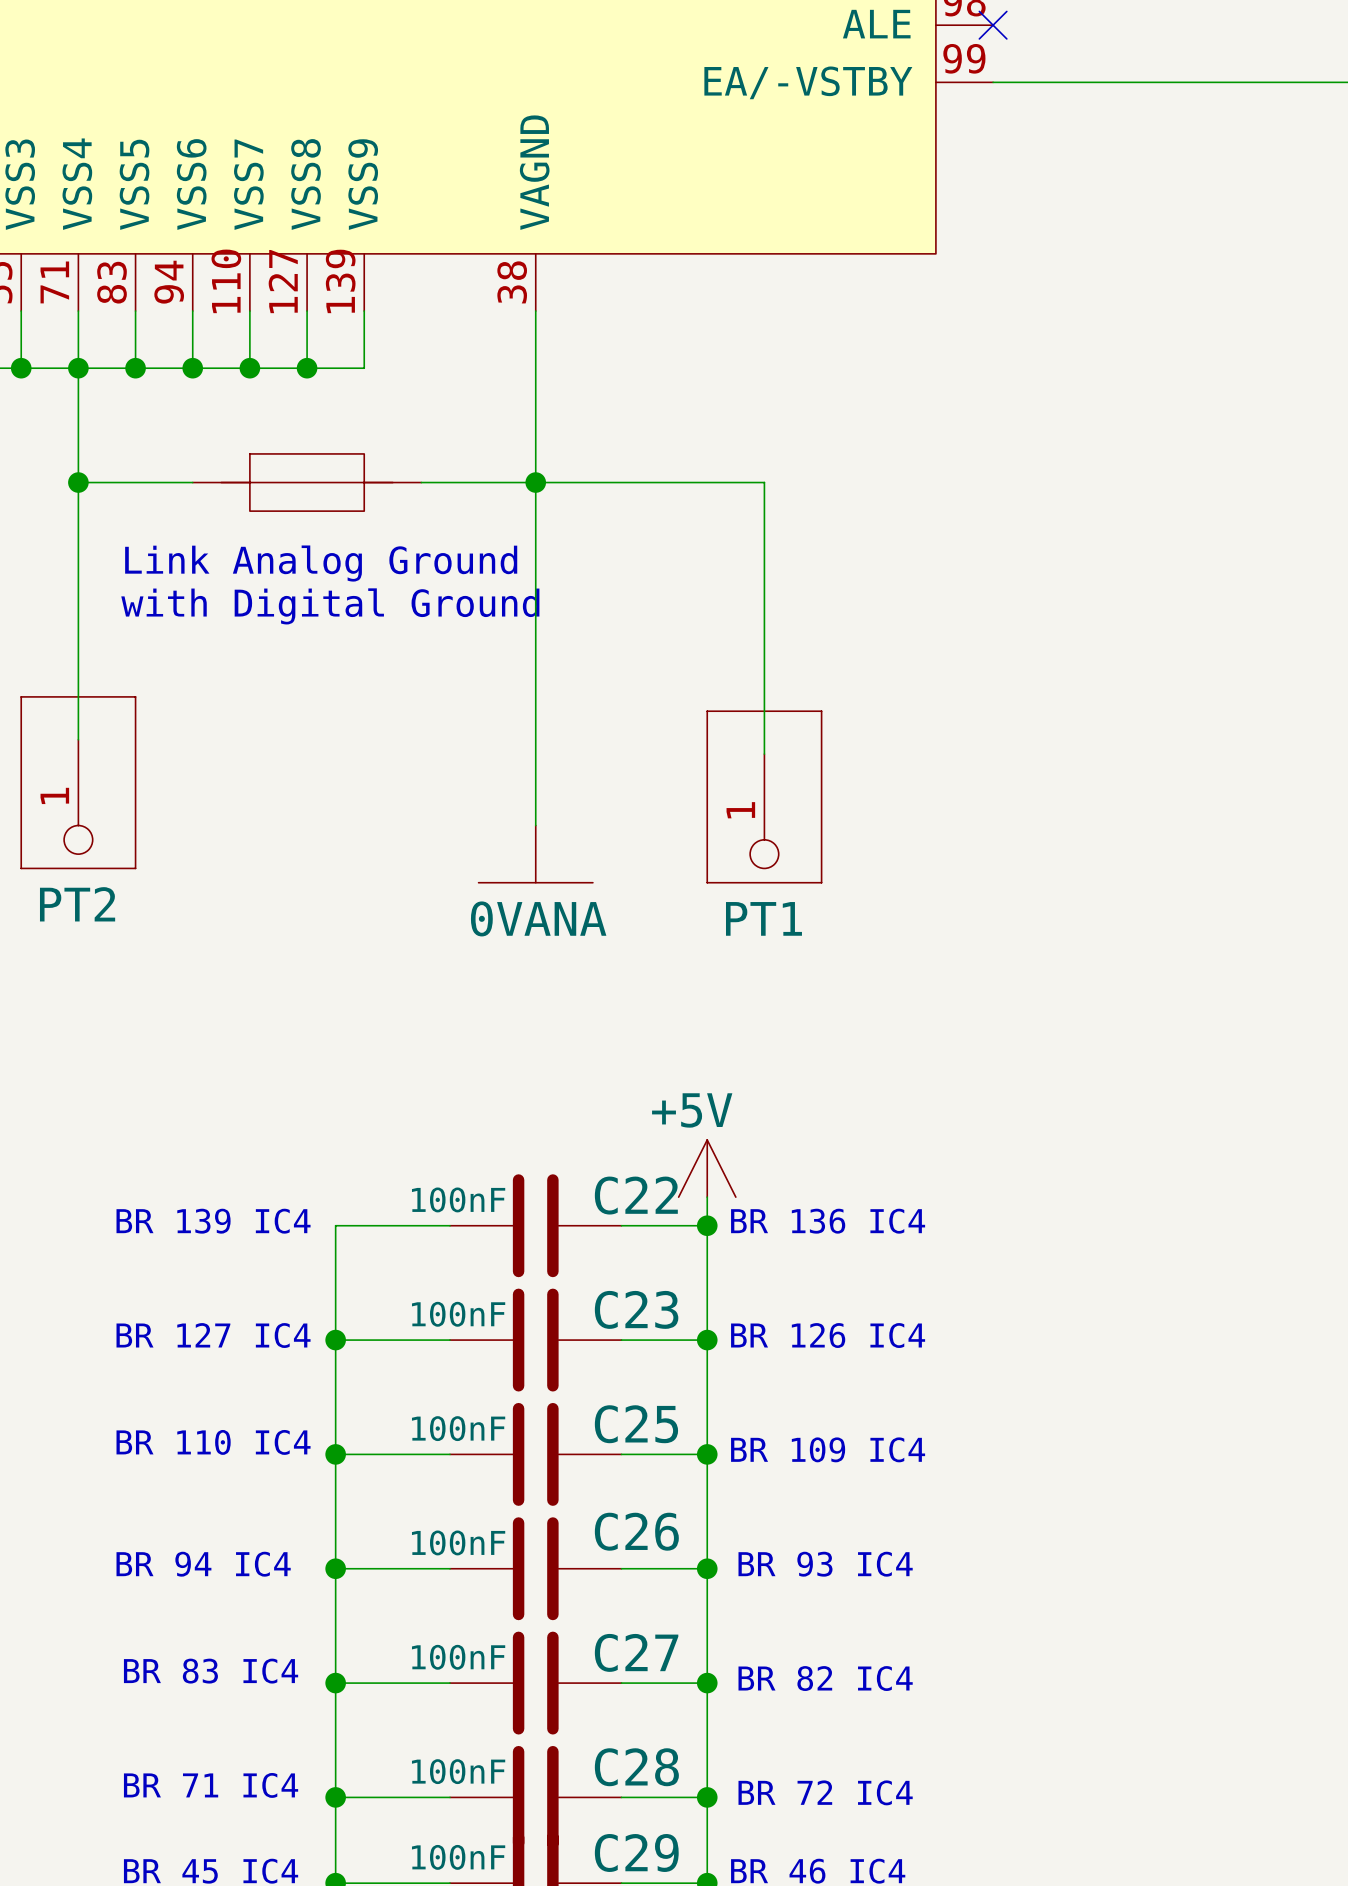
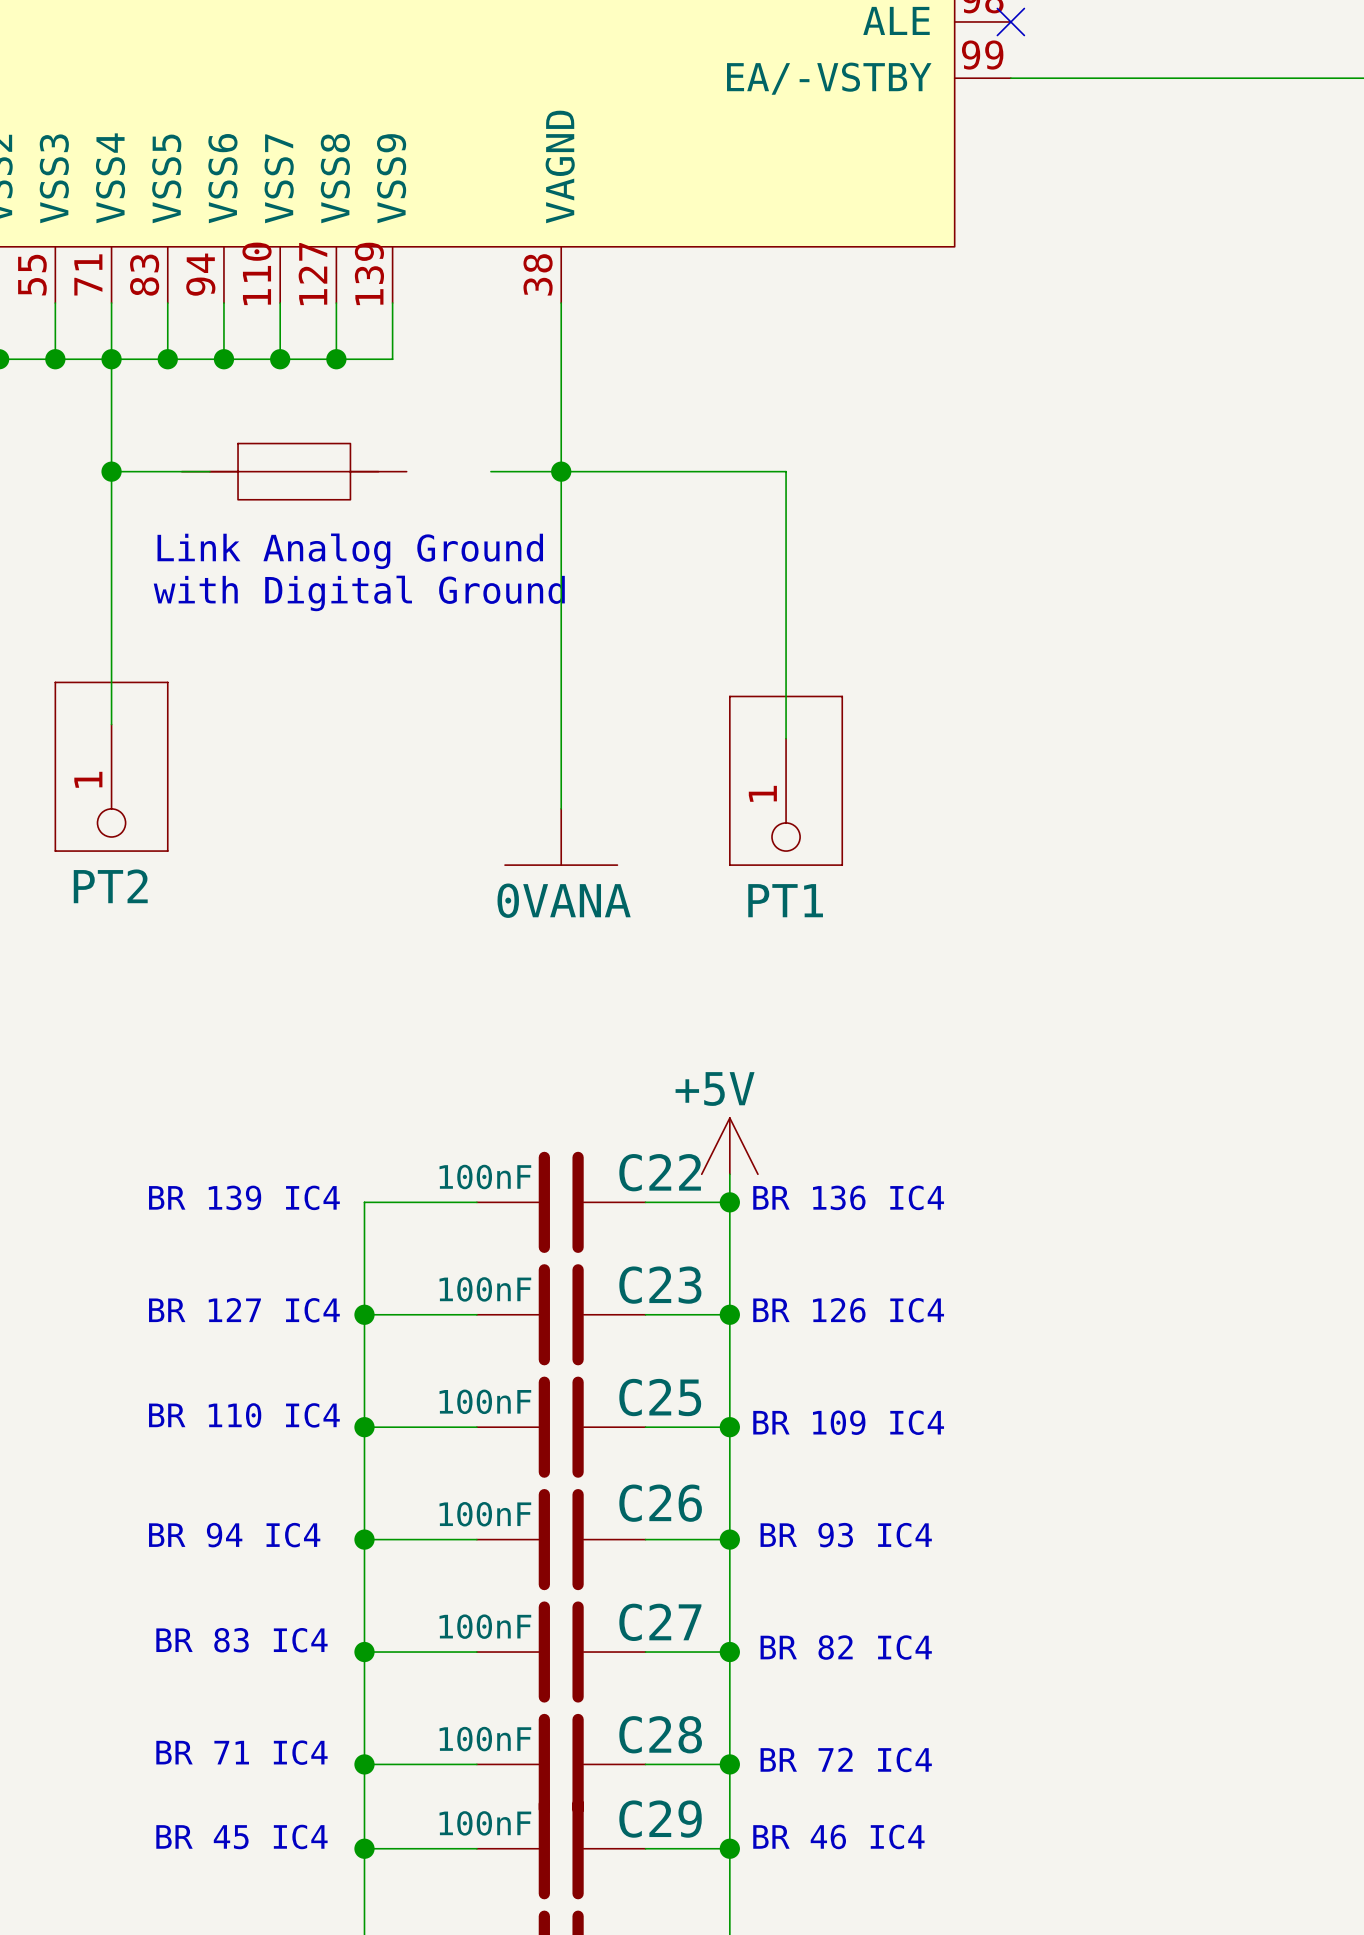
part position: (307, 482) -> (294, 471)
wire: (421, 482) (464, 482) -> none

